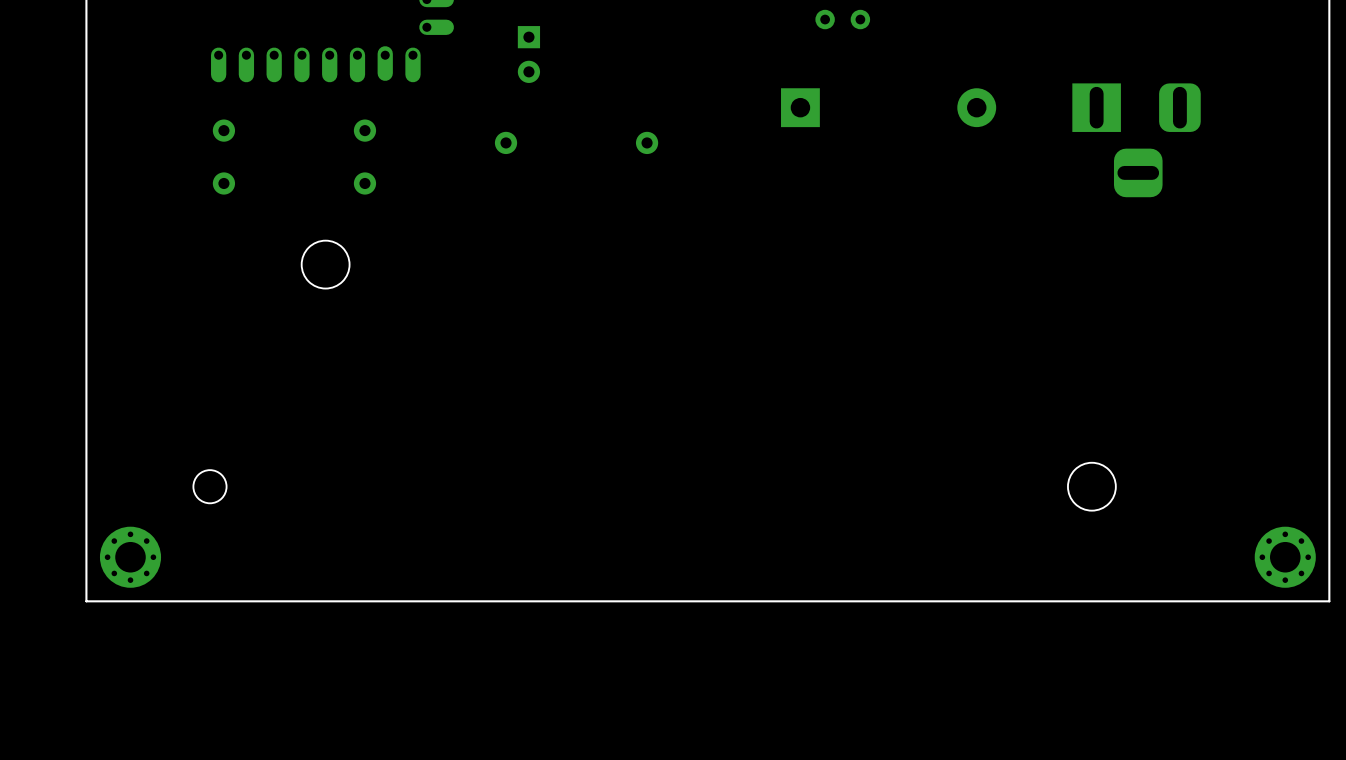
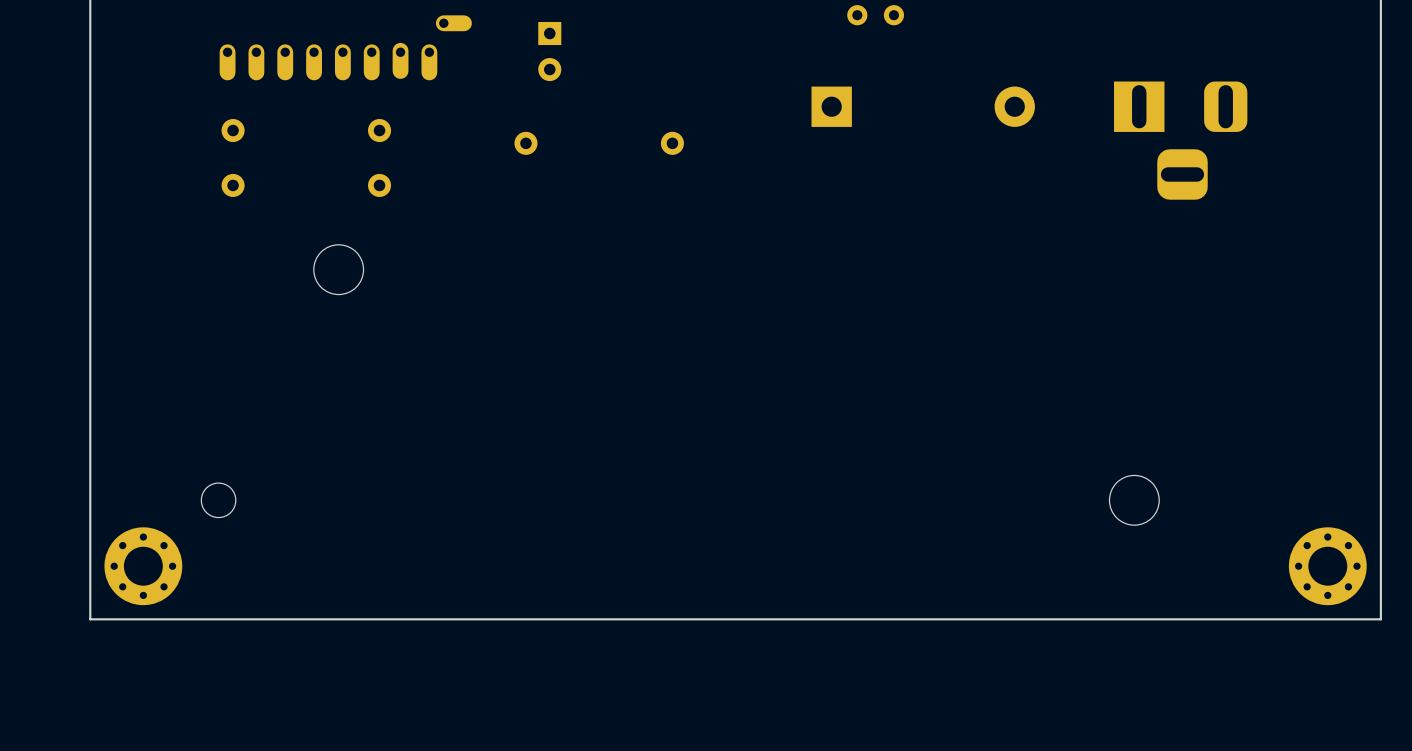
part footprint: [99, 526, 162, 588] -> [104, 527, 183, 606]
part footprint: [1254, 526, 1316, 588] -> [1288, 527, 1367, 606]

